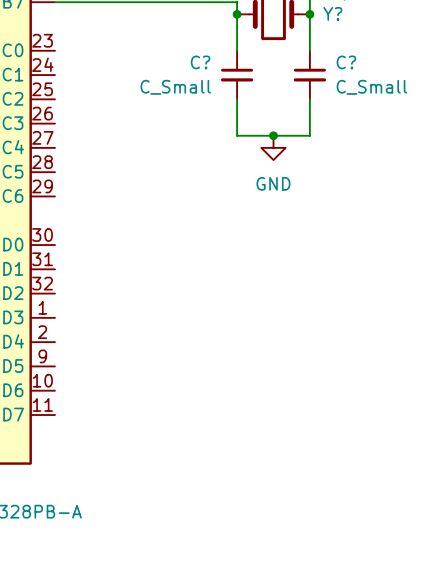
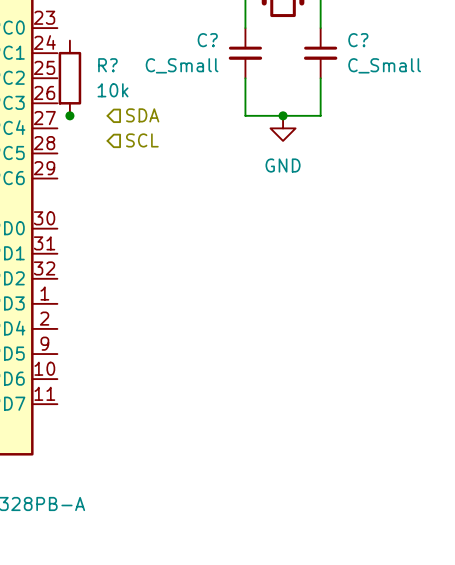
R?: none -> 10k (69, 78)
junction: none -> (69, 115)
hierarchical label: none -> SDA (142, 115)
hierarchical label: none -> SCL (142, 140)

